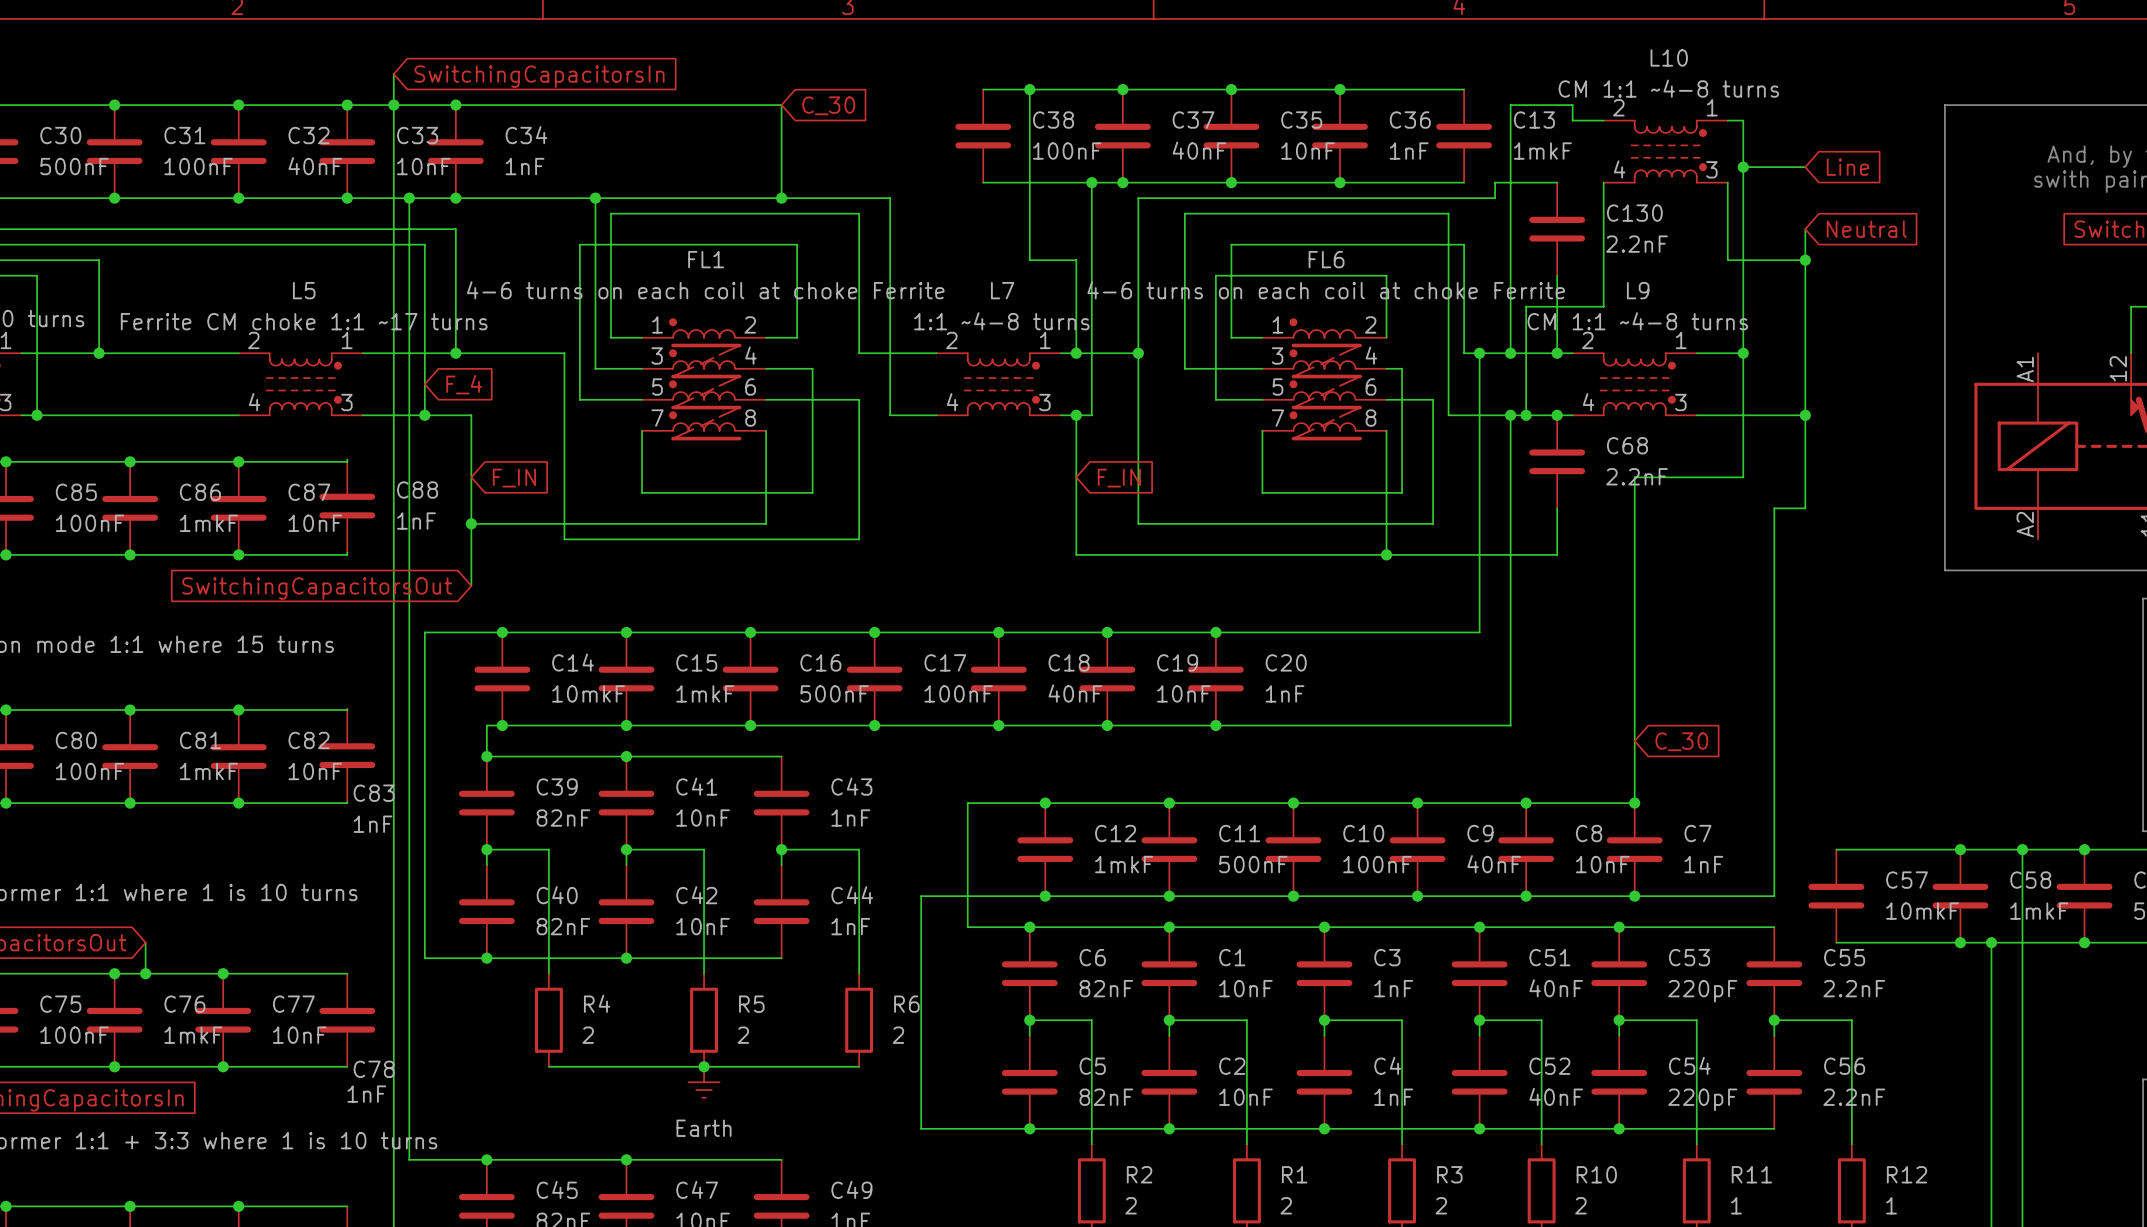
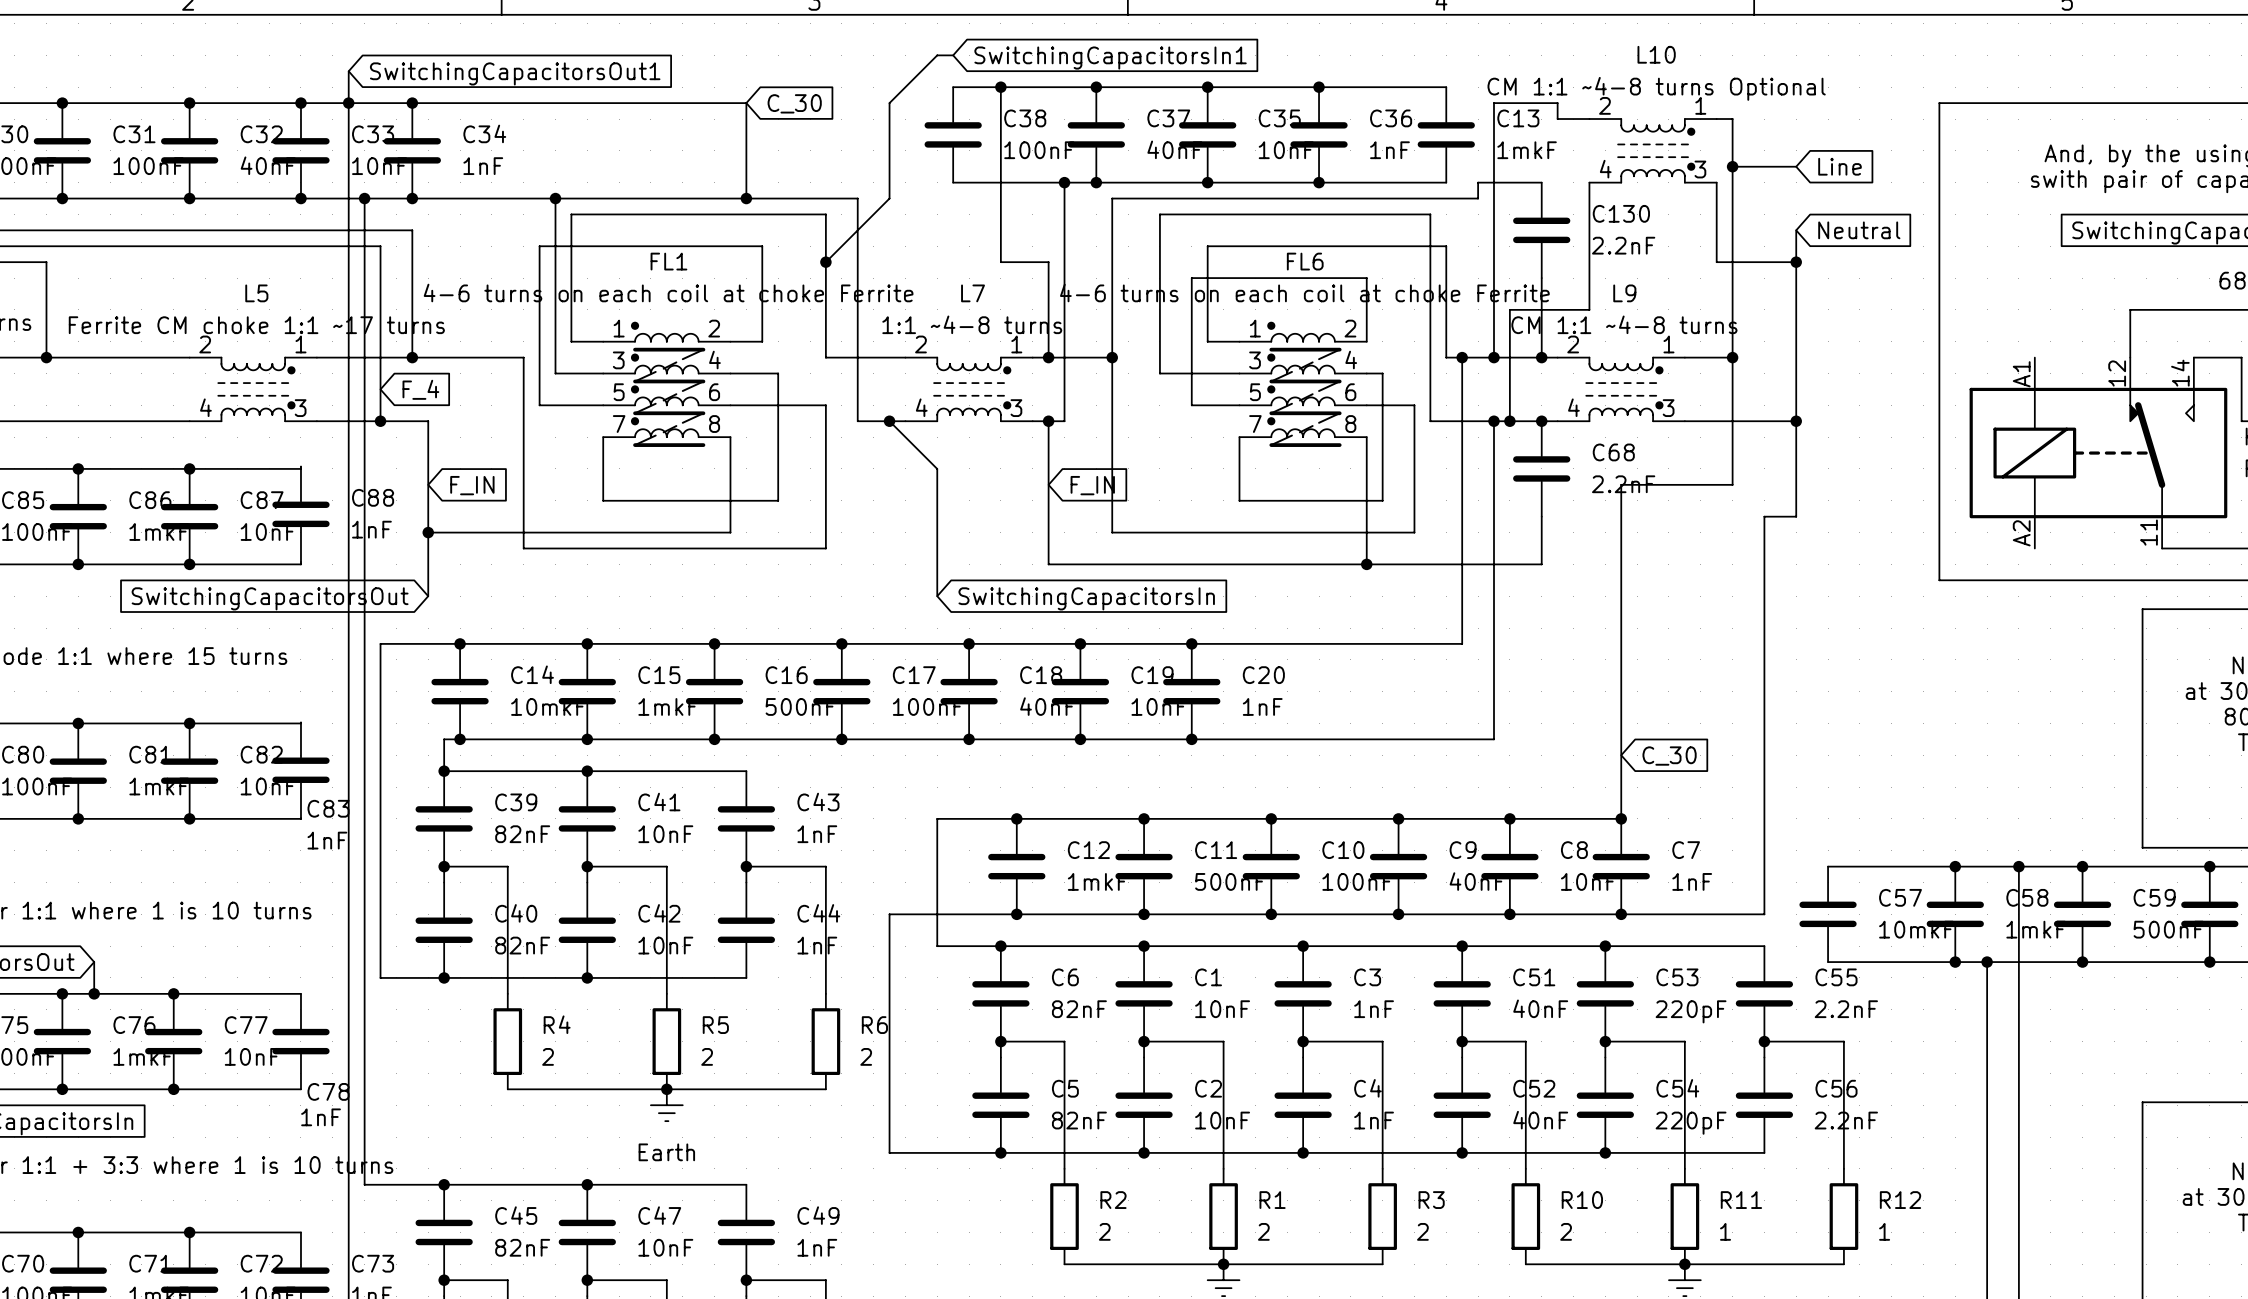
wire: none -> (953, 55) (937, 55) (889, 103) (889, 198) (825, 262)
global label: none -> SwitchingCapacitorsIn1 (1110, 58)
global label: SwitchingCapacitorsIn (539, 76) -> SwitchingCapacitorsOut1 (515, 73)
L10 value: CM 1:1 ~4-8 turns (1668, 88) -> CM 1:1 ~4-8 turns Optional (1656, 88)
junction: none -> (825, 262)
wire: none -> (889, 421) (937, 468) (937, 596)
junction: none -> (889, 421)
global label: none -> SwitchingCapacitorsIn (1086, 598)

